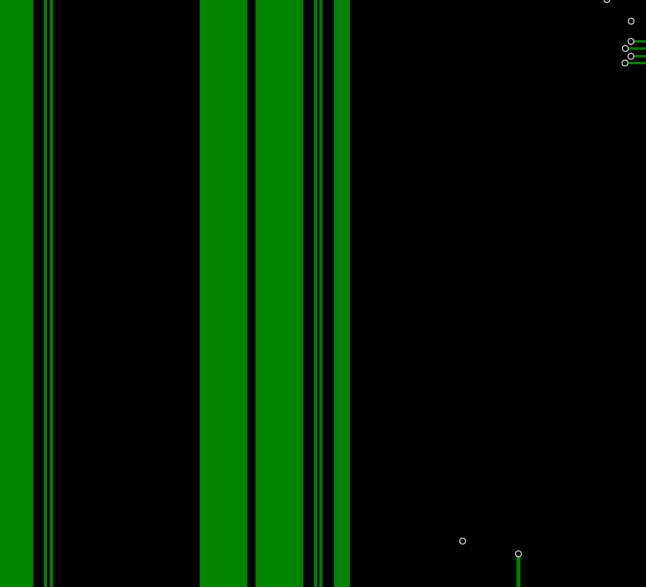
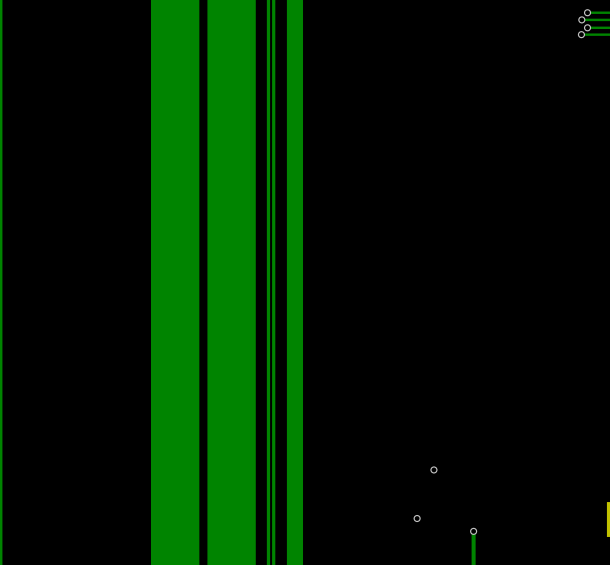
via: none -> (433, 469)

